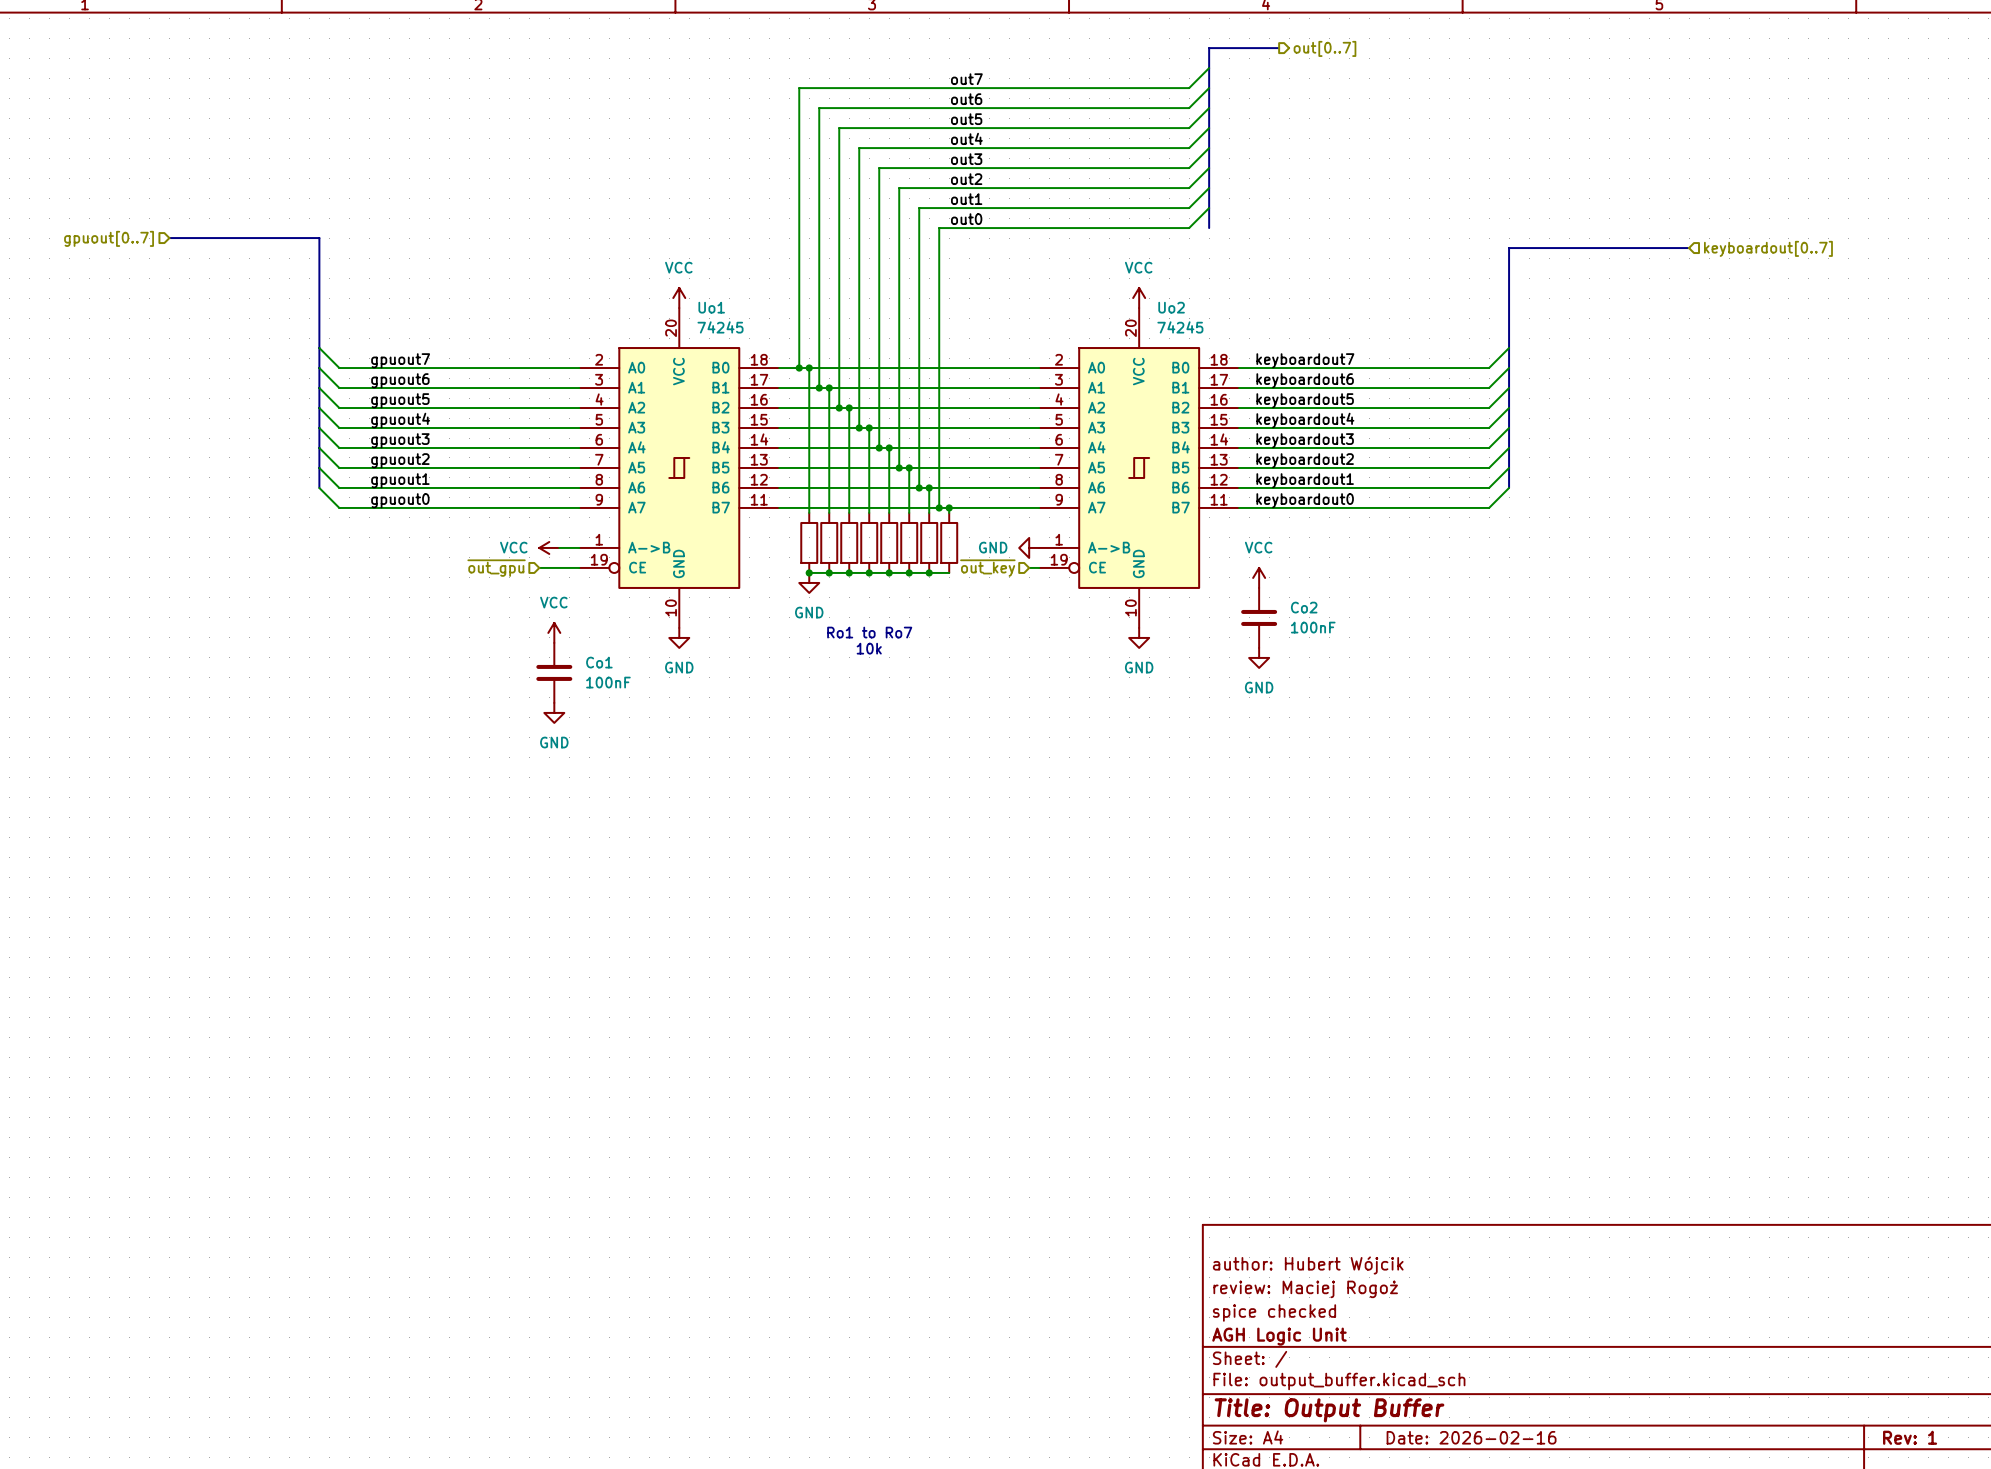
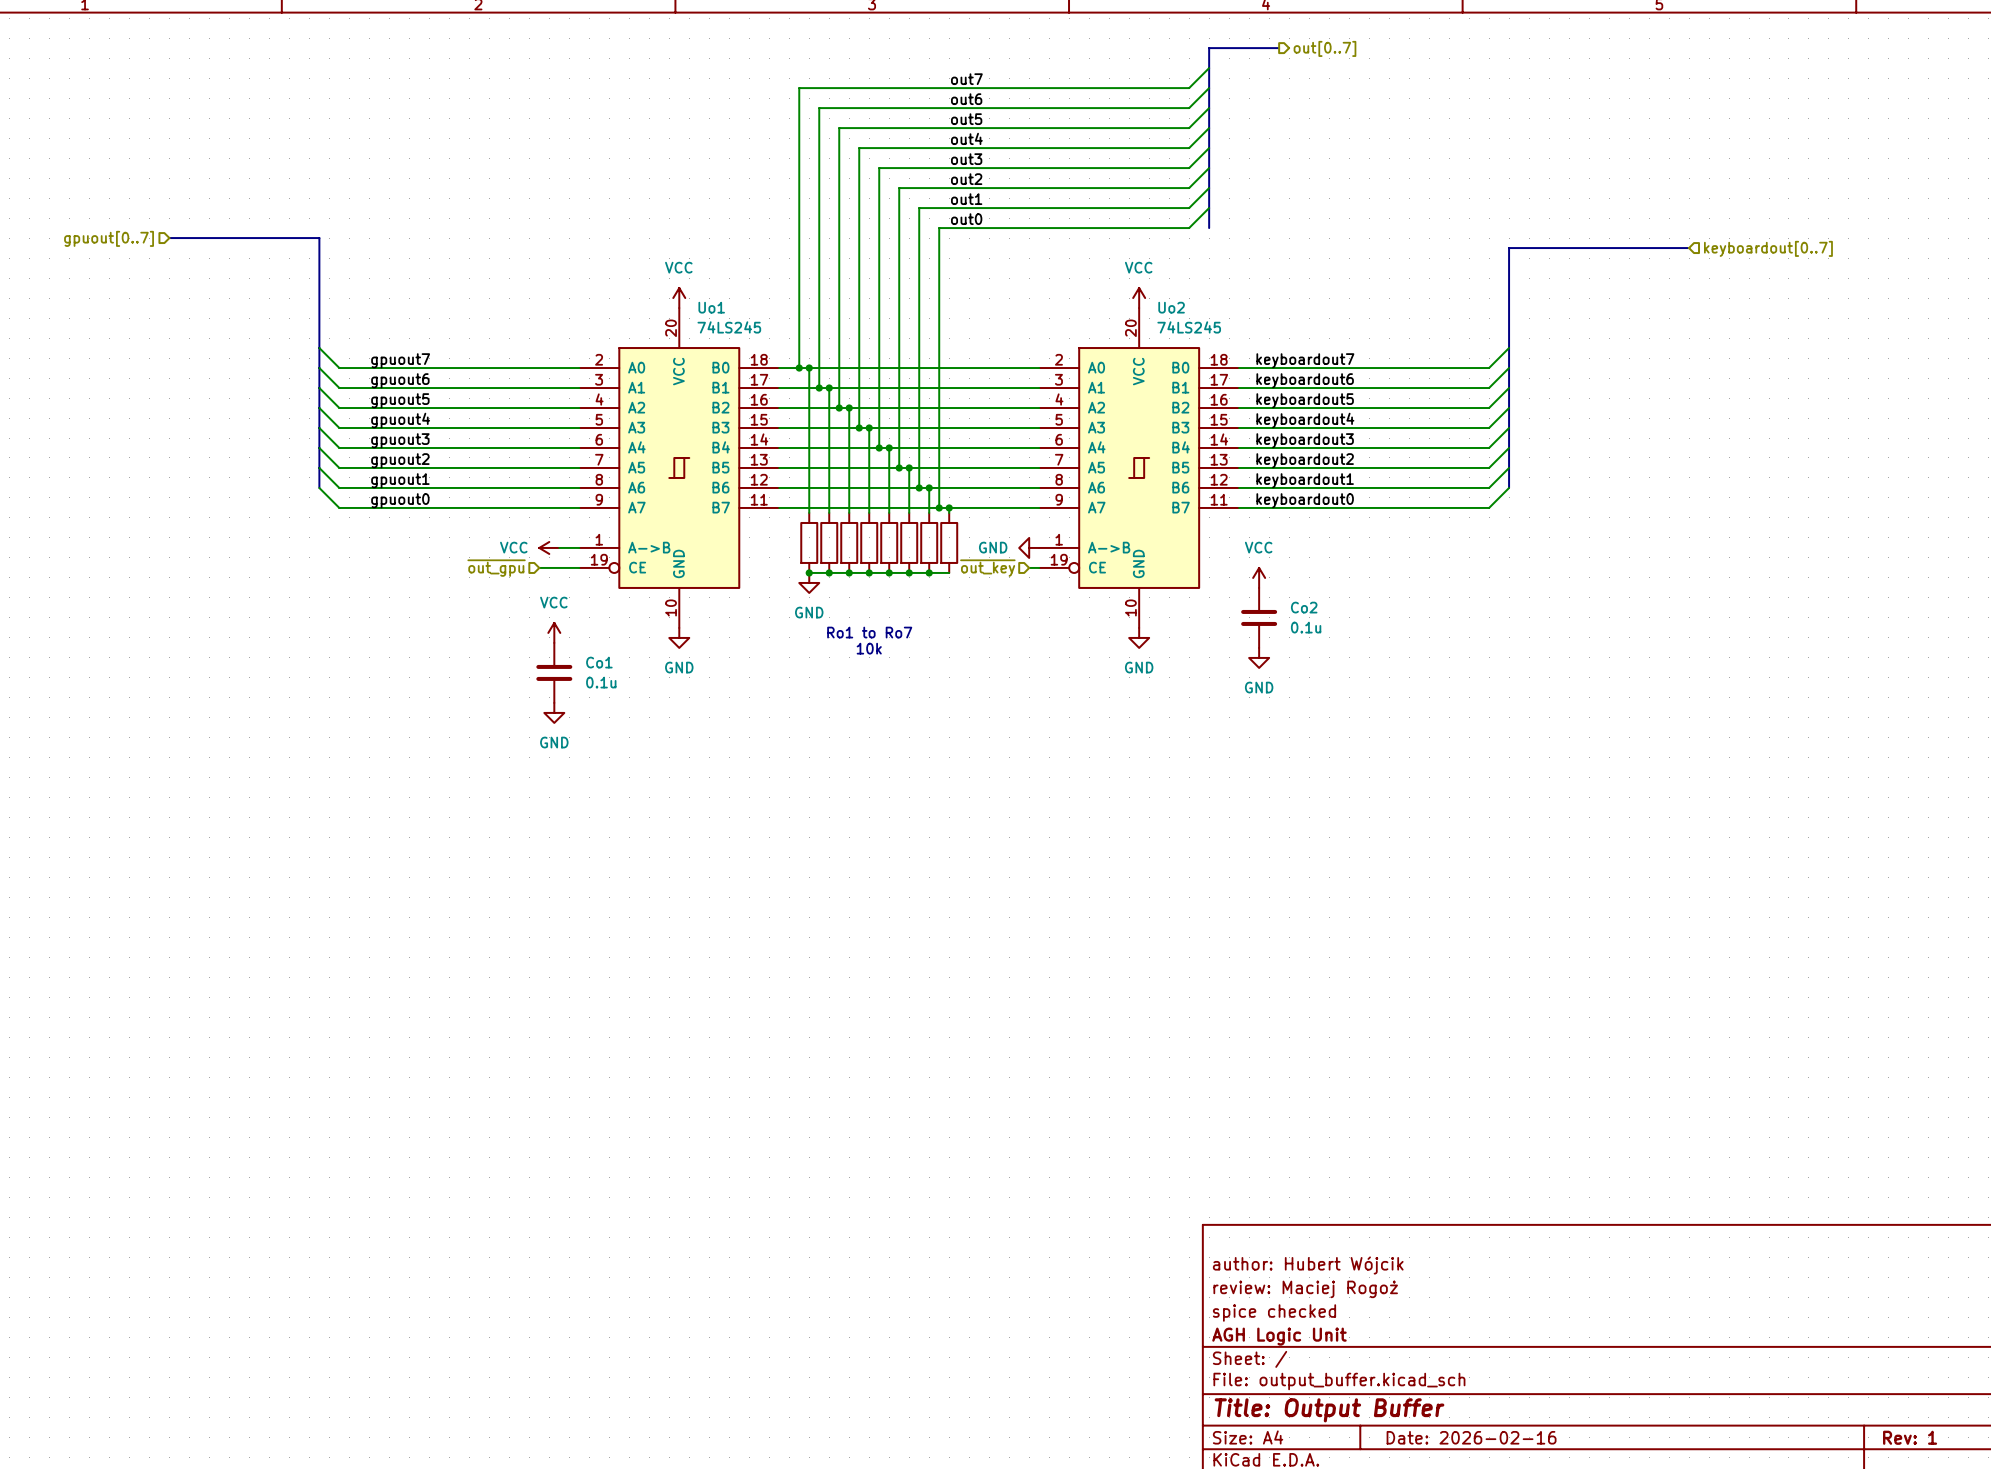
Uo1 value: 74245 (720, 327) -> 74LS245 (729, 327)
Uo2 value: 74245 (1180, 327) -> 74LS245 (1189, 327)
Co2 value: 100nF (1313, 627) -> 0.1u (1306, 627)
Co1 value: 100nF (608, 682) -> 0.1u (601, 682)

